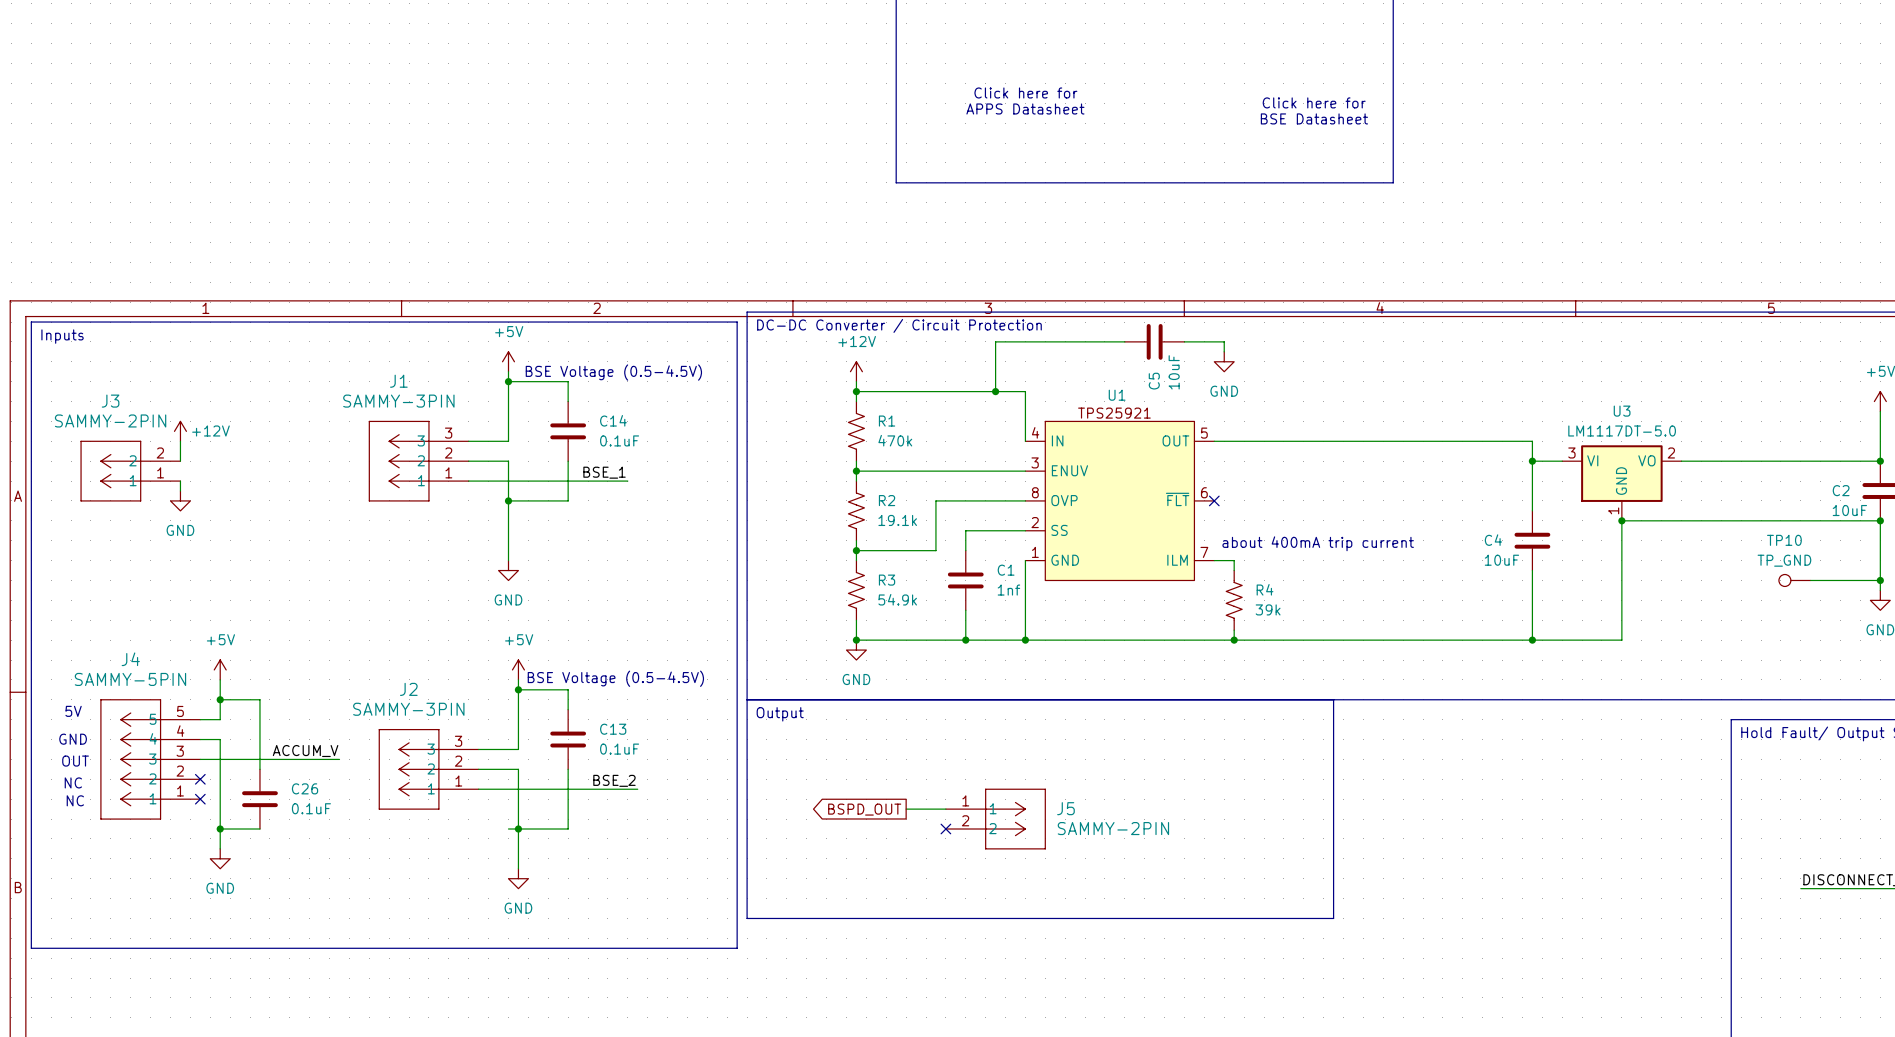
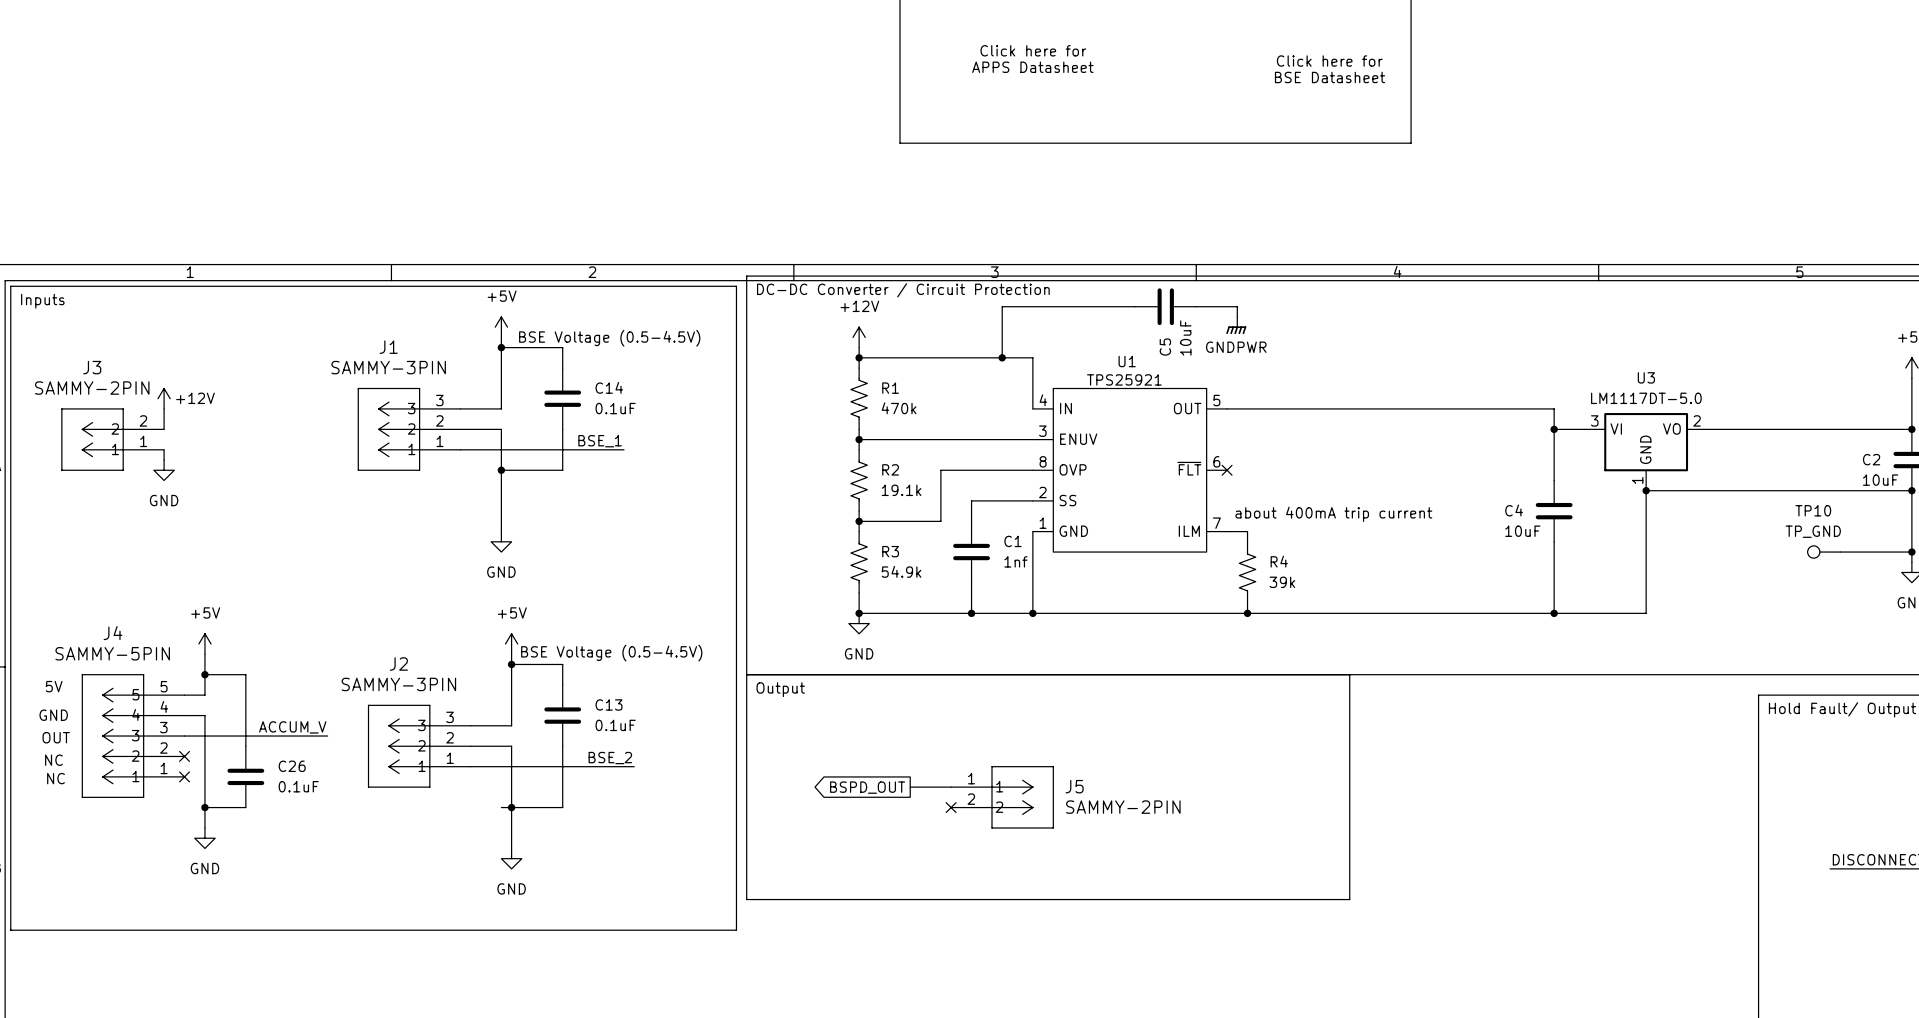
power symbol: GND (1224, 361) -> GNDPWR (1236, 325)

